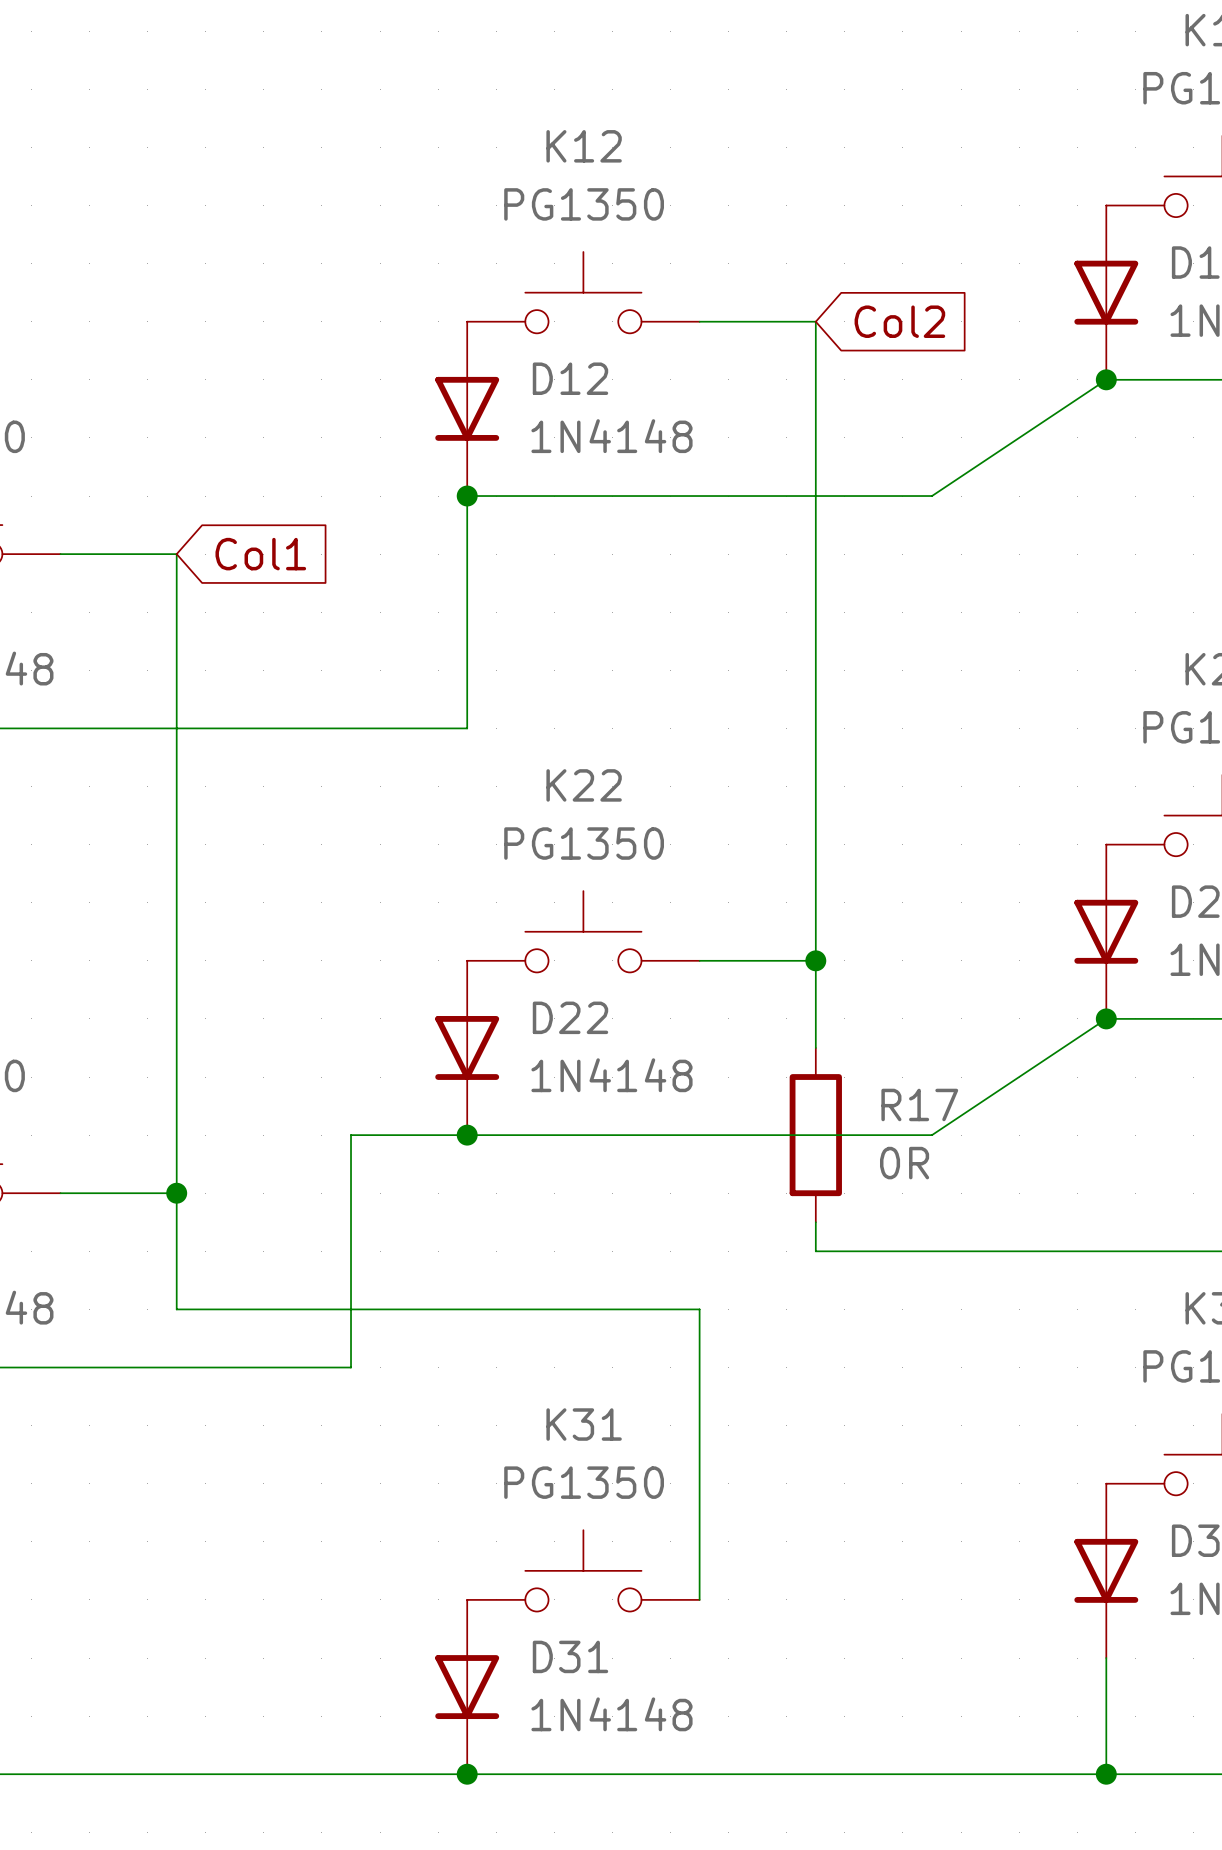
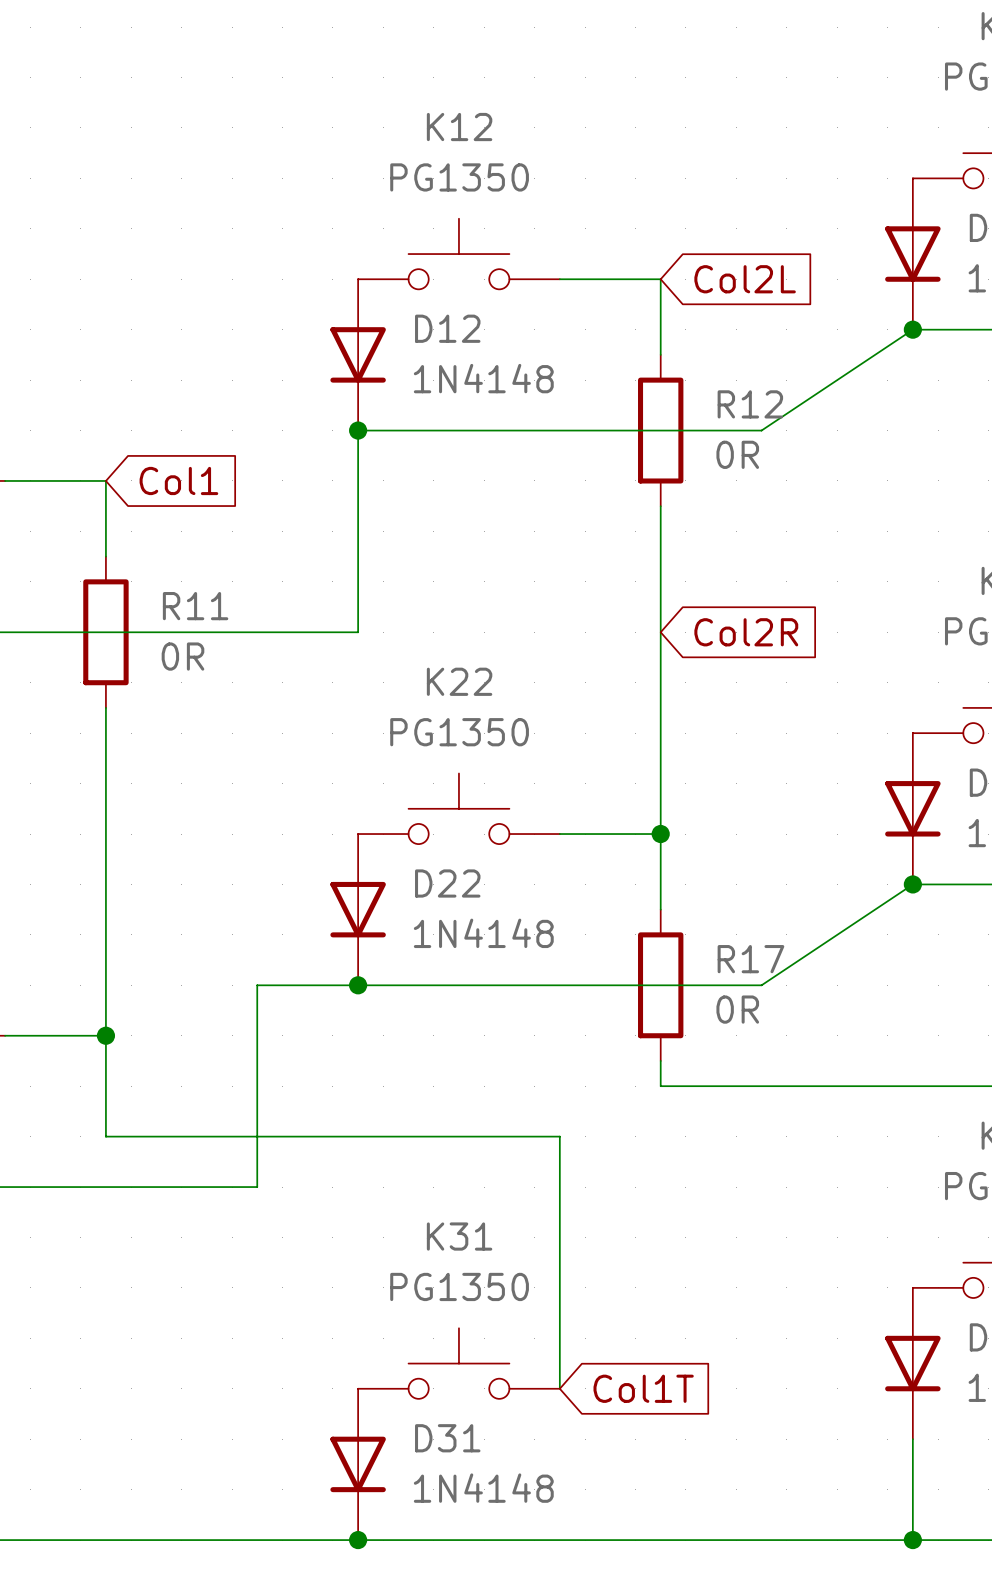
global label: Col2 (899, 321) -> Col2L (745, 279)
wire: (815, 408) (815, 583) -> none
R12: none -> 0R (660, 430)
wire: (176, 641) (176, 815) -> none
R11: none -> 0R (105, 632)
global label: none -> Col2R (746, 632)
global label: none -> Col1T (643, 1388)

